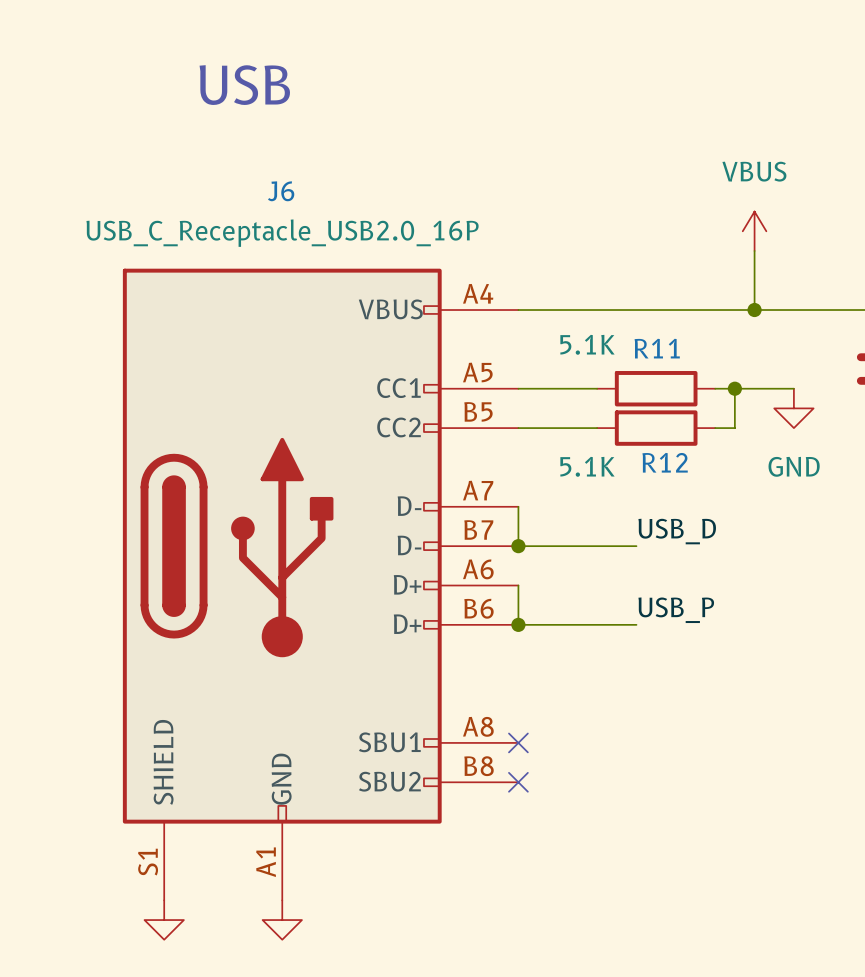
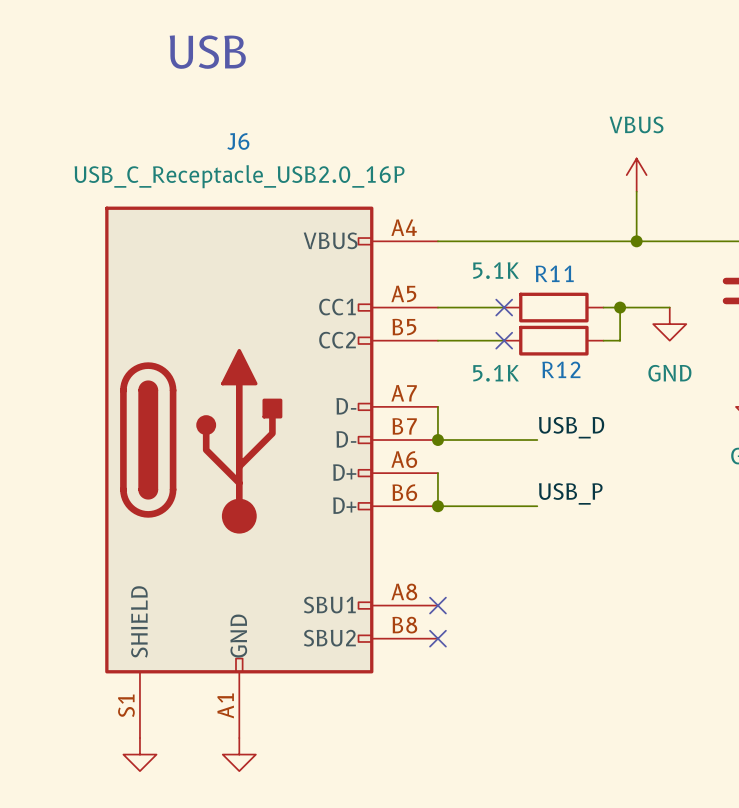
no-connect mark: none -> (504, 307)
no-connect mark: none -> (504, 340)

